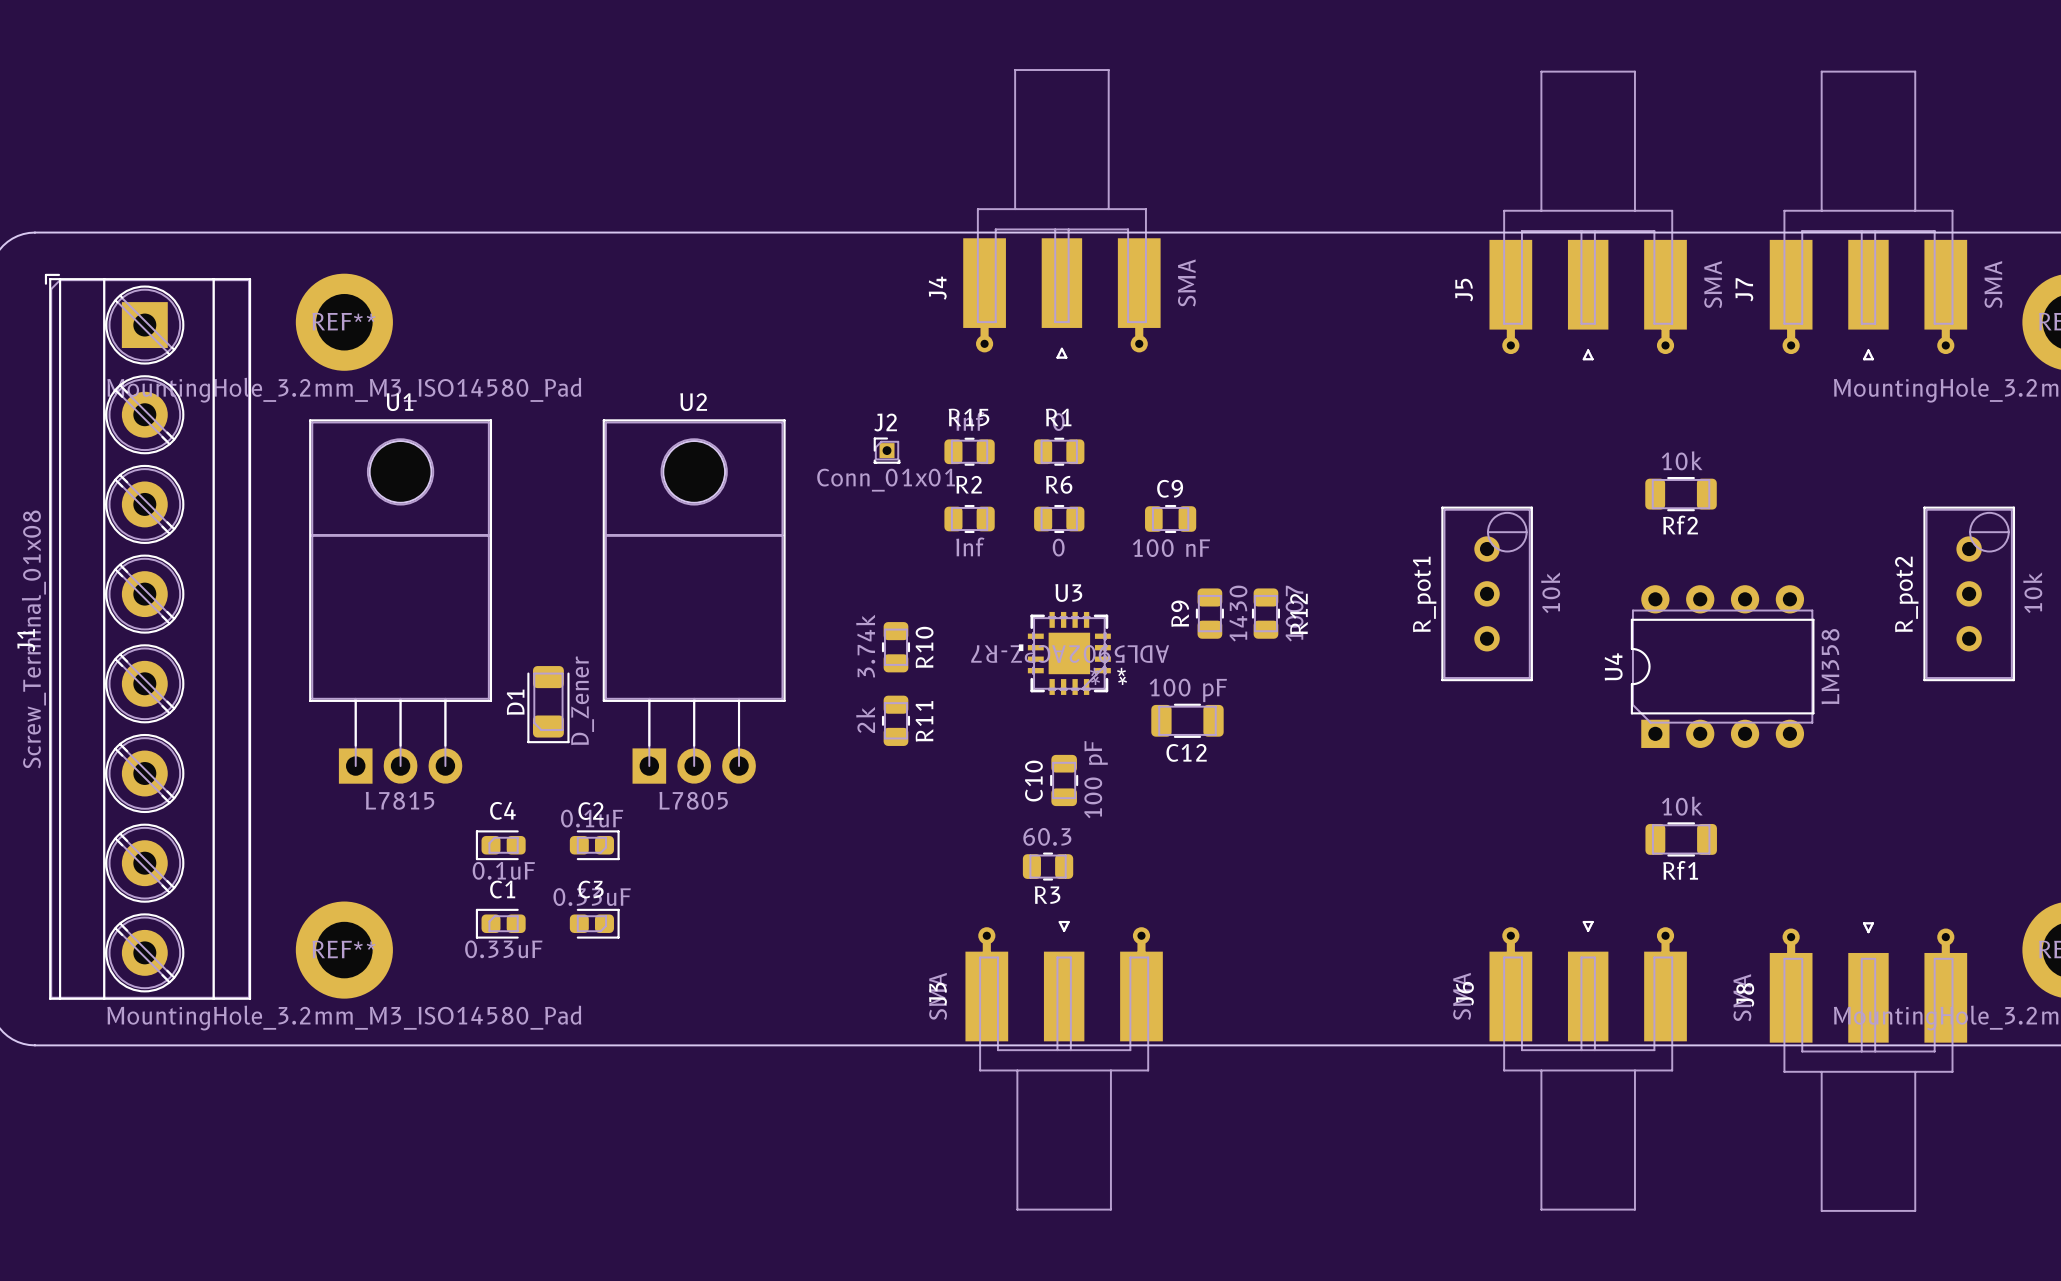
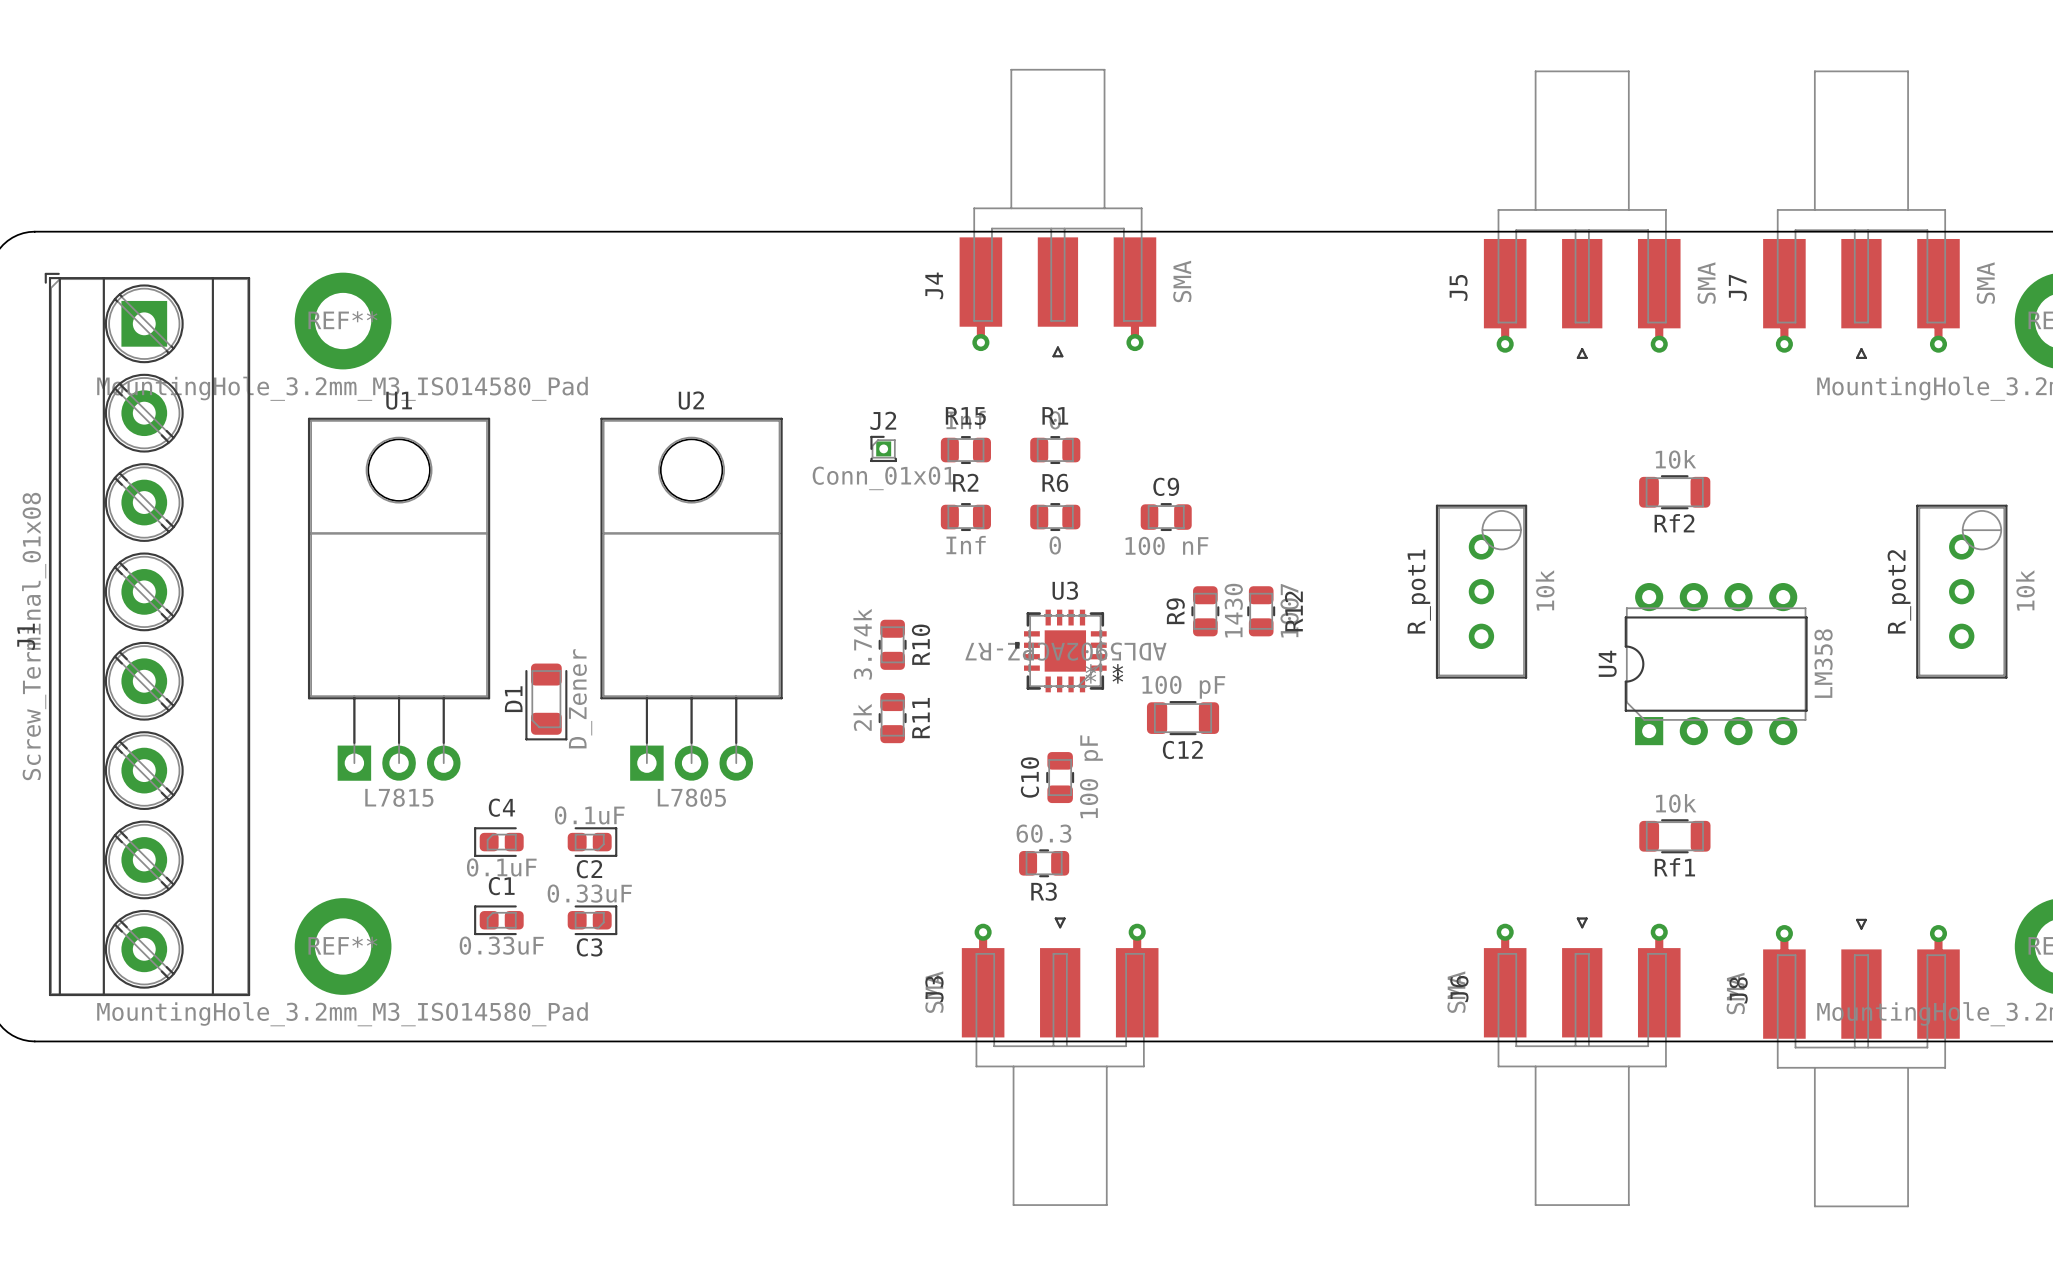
C2 name position: C2 (591, 811) -> C2 (589, 869)
C3 name position: C3 (591, 889) -> C3 (589, 947)

